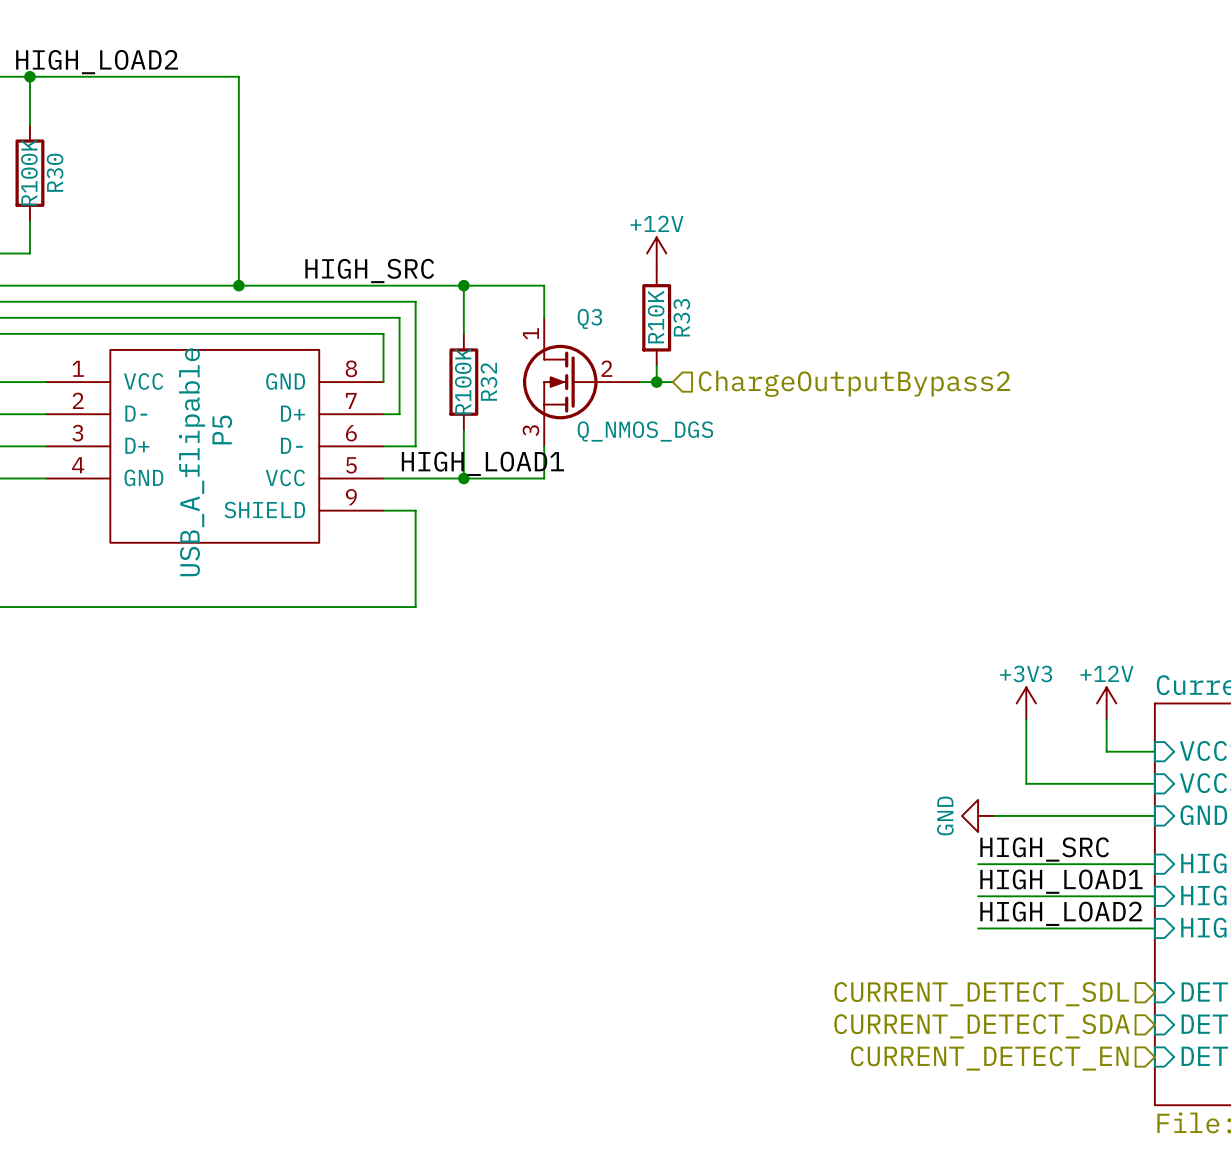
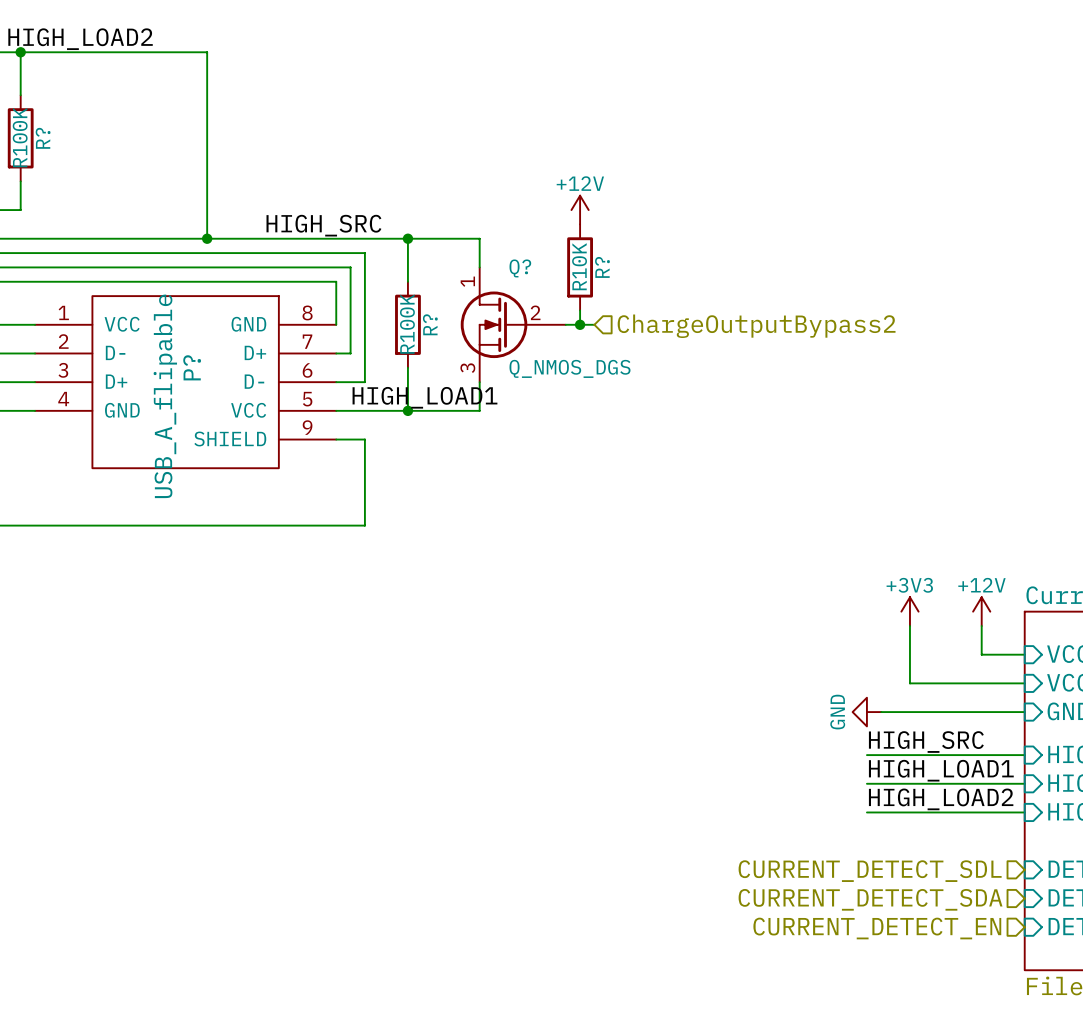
R30 name: R30 (55, 172) -> R? (43, 138)
R33 name: R33 (681, 317) -> R? (602, 267)
Q3 name: Q3 (589, 318) -> Q? (520, 268)
R32 name: R32 (488, 381) -> R? (430, 324)
P5 name: P5 (222, 429) -> P? (192, 367)

